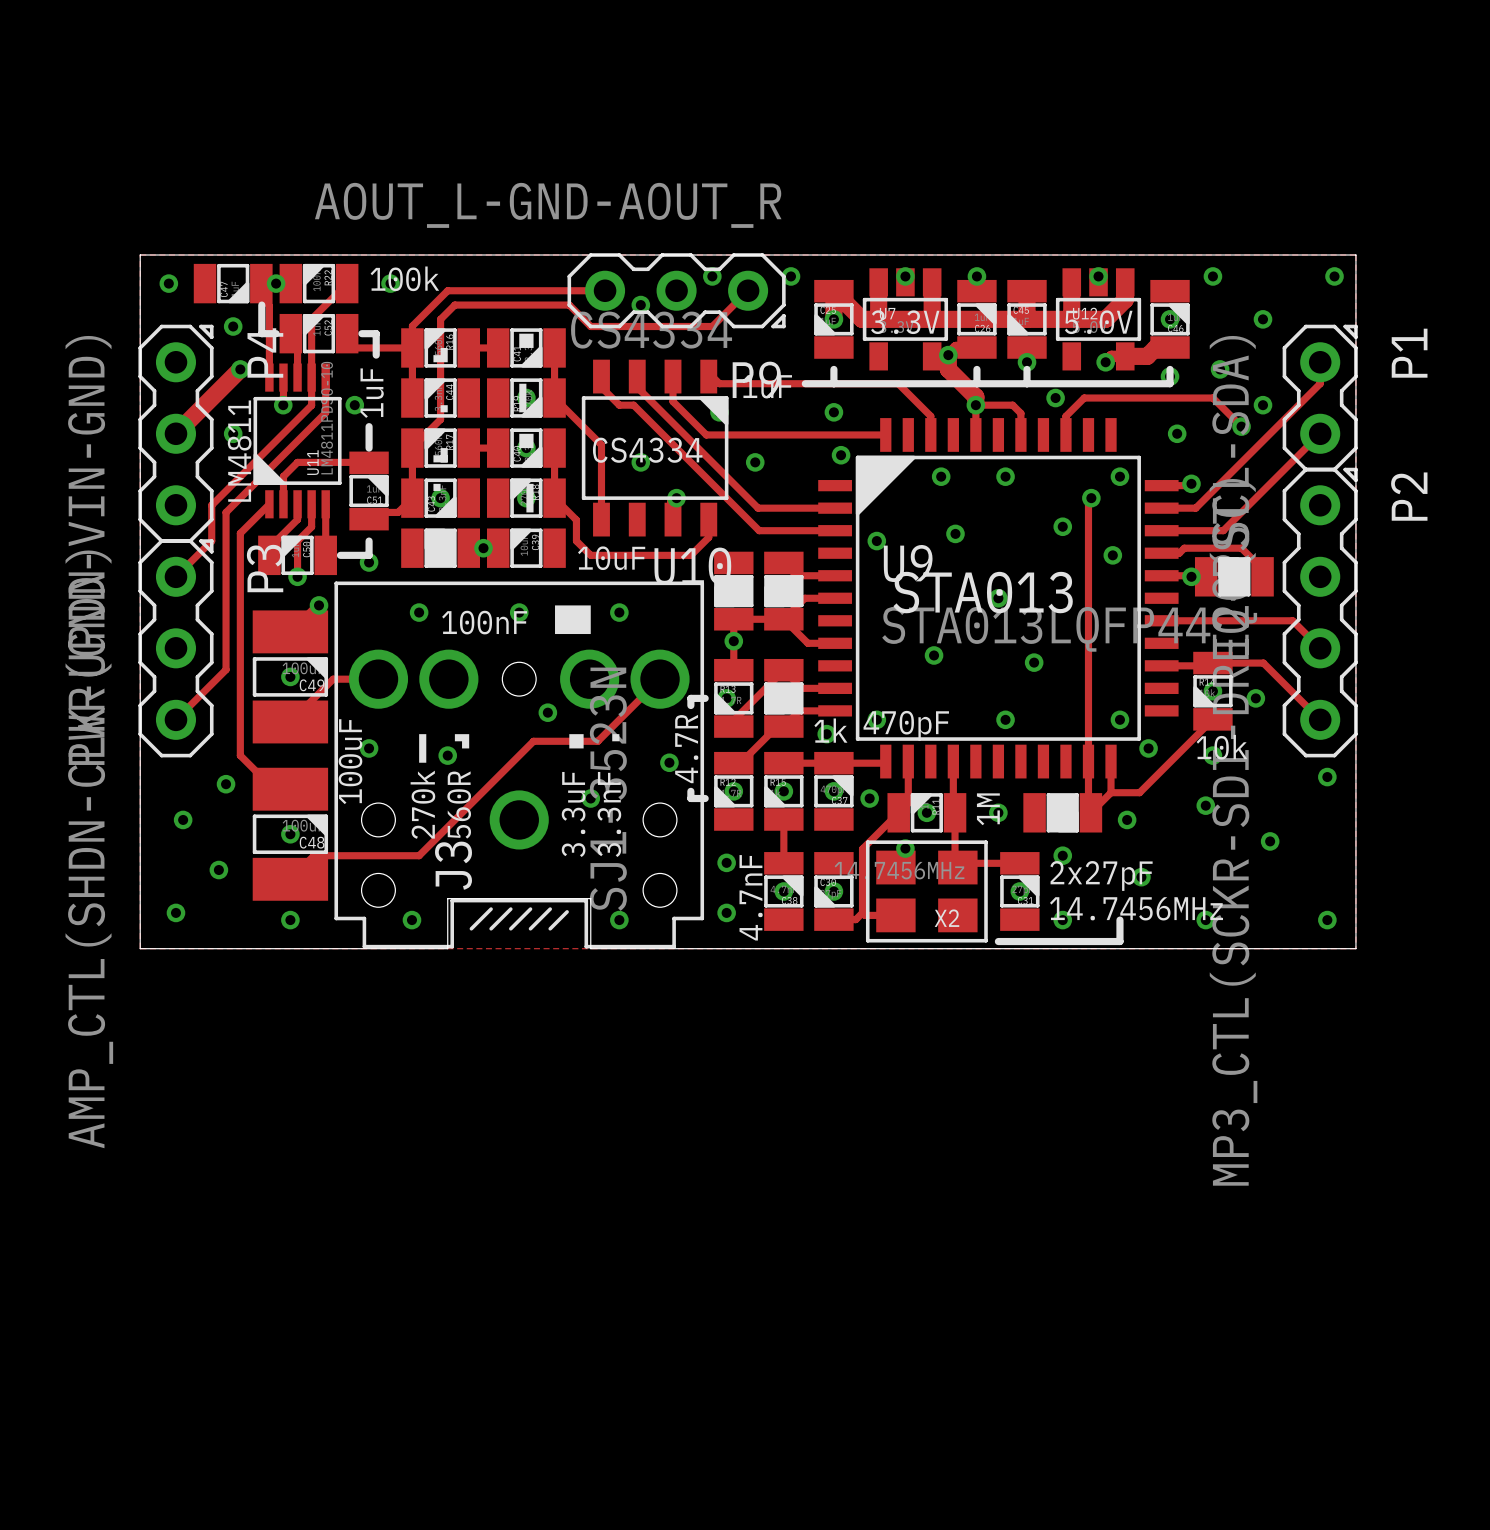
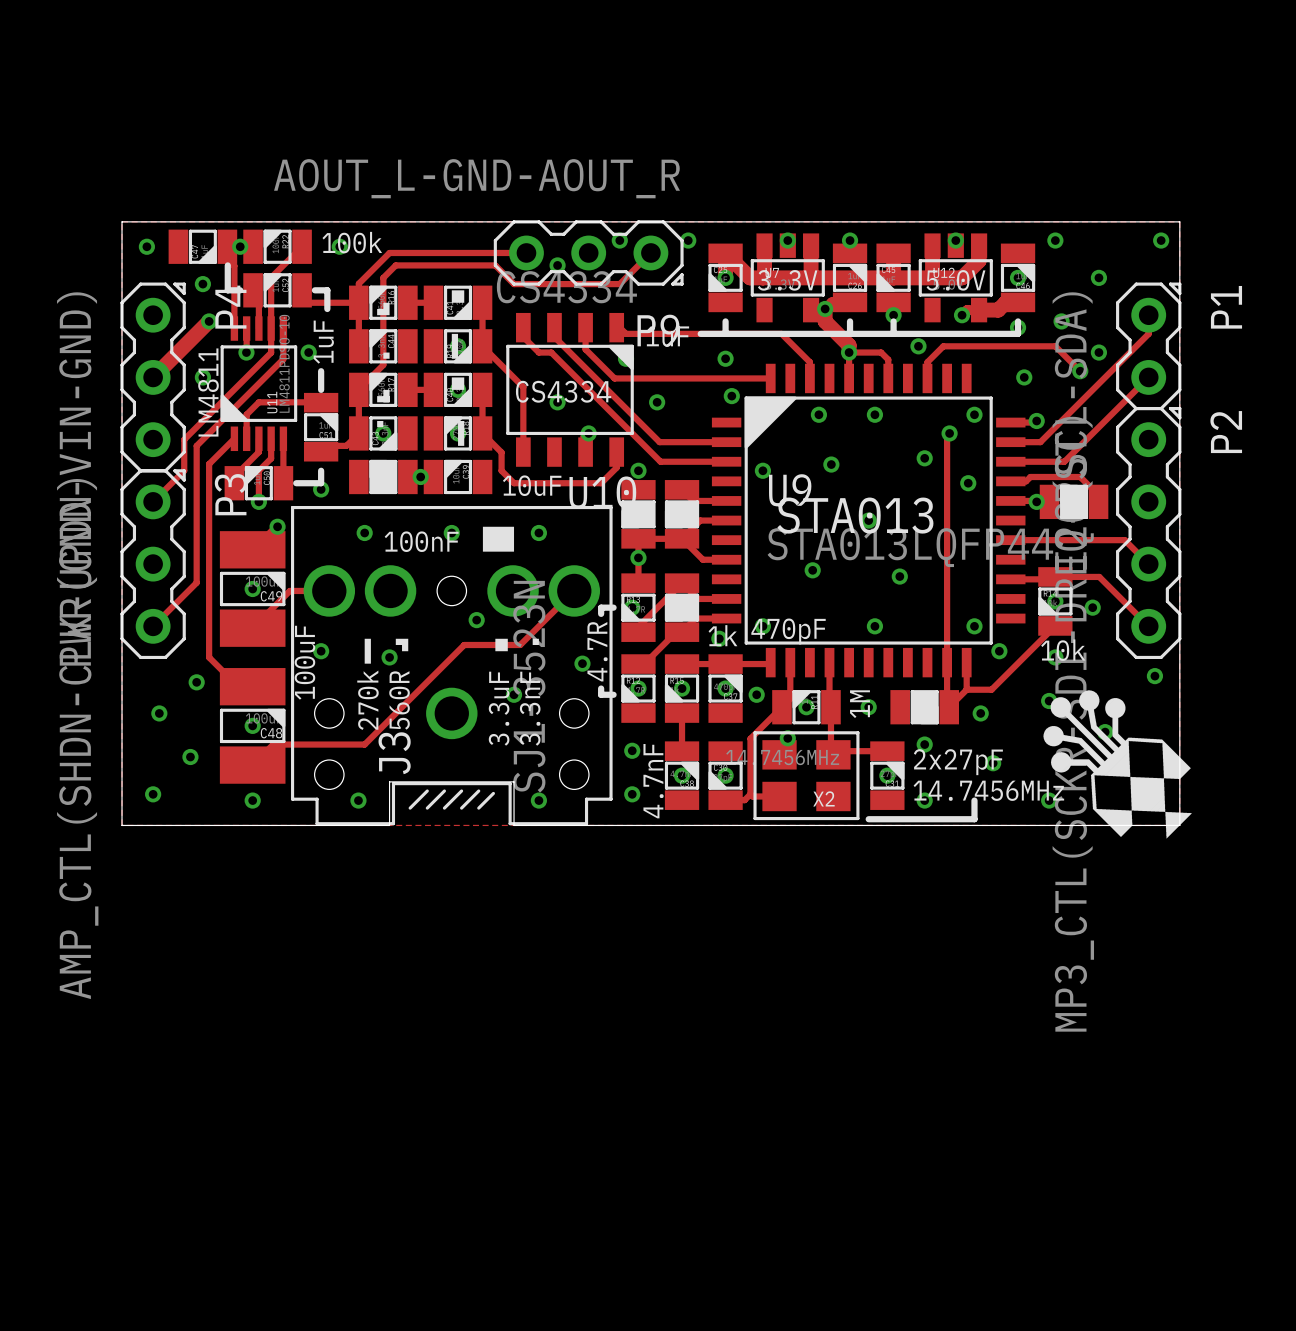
via: none -> (638, 470)
drawing: none -> [1043, 690, 1192, 839]

